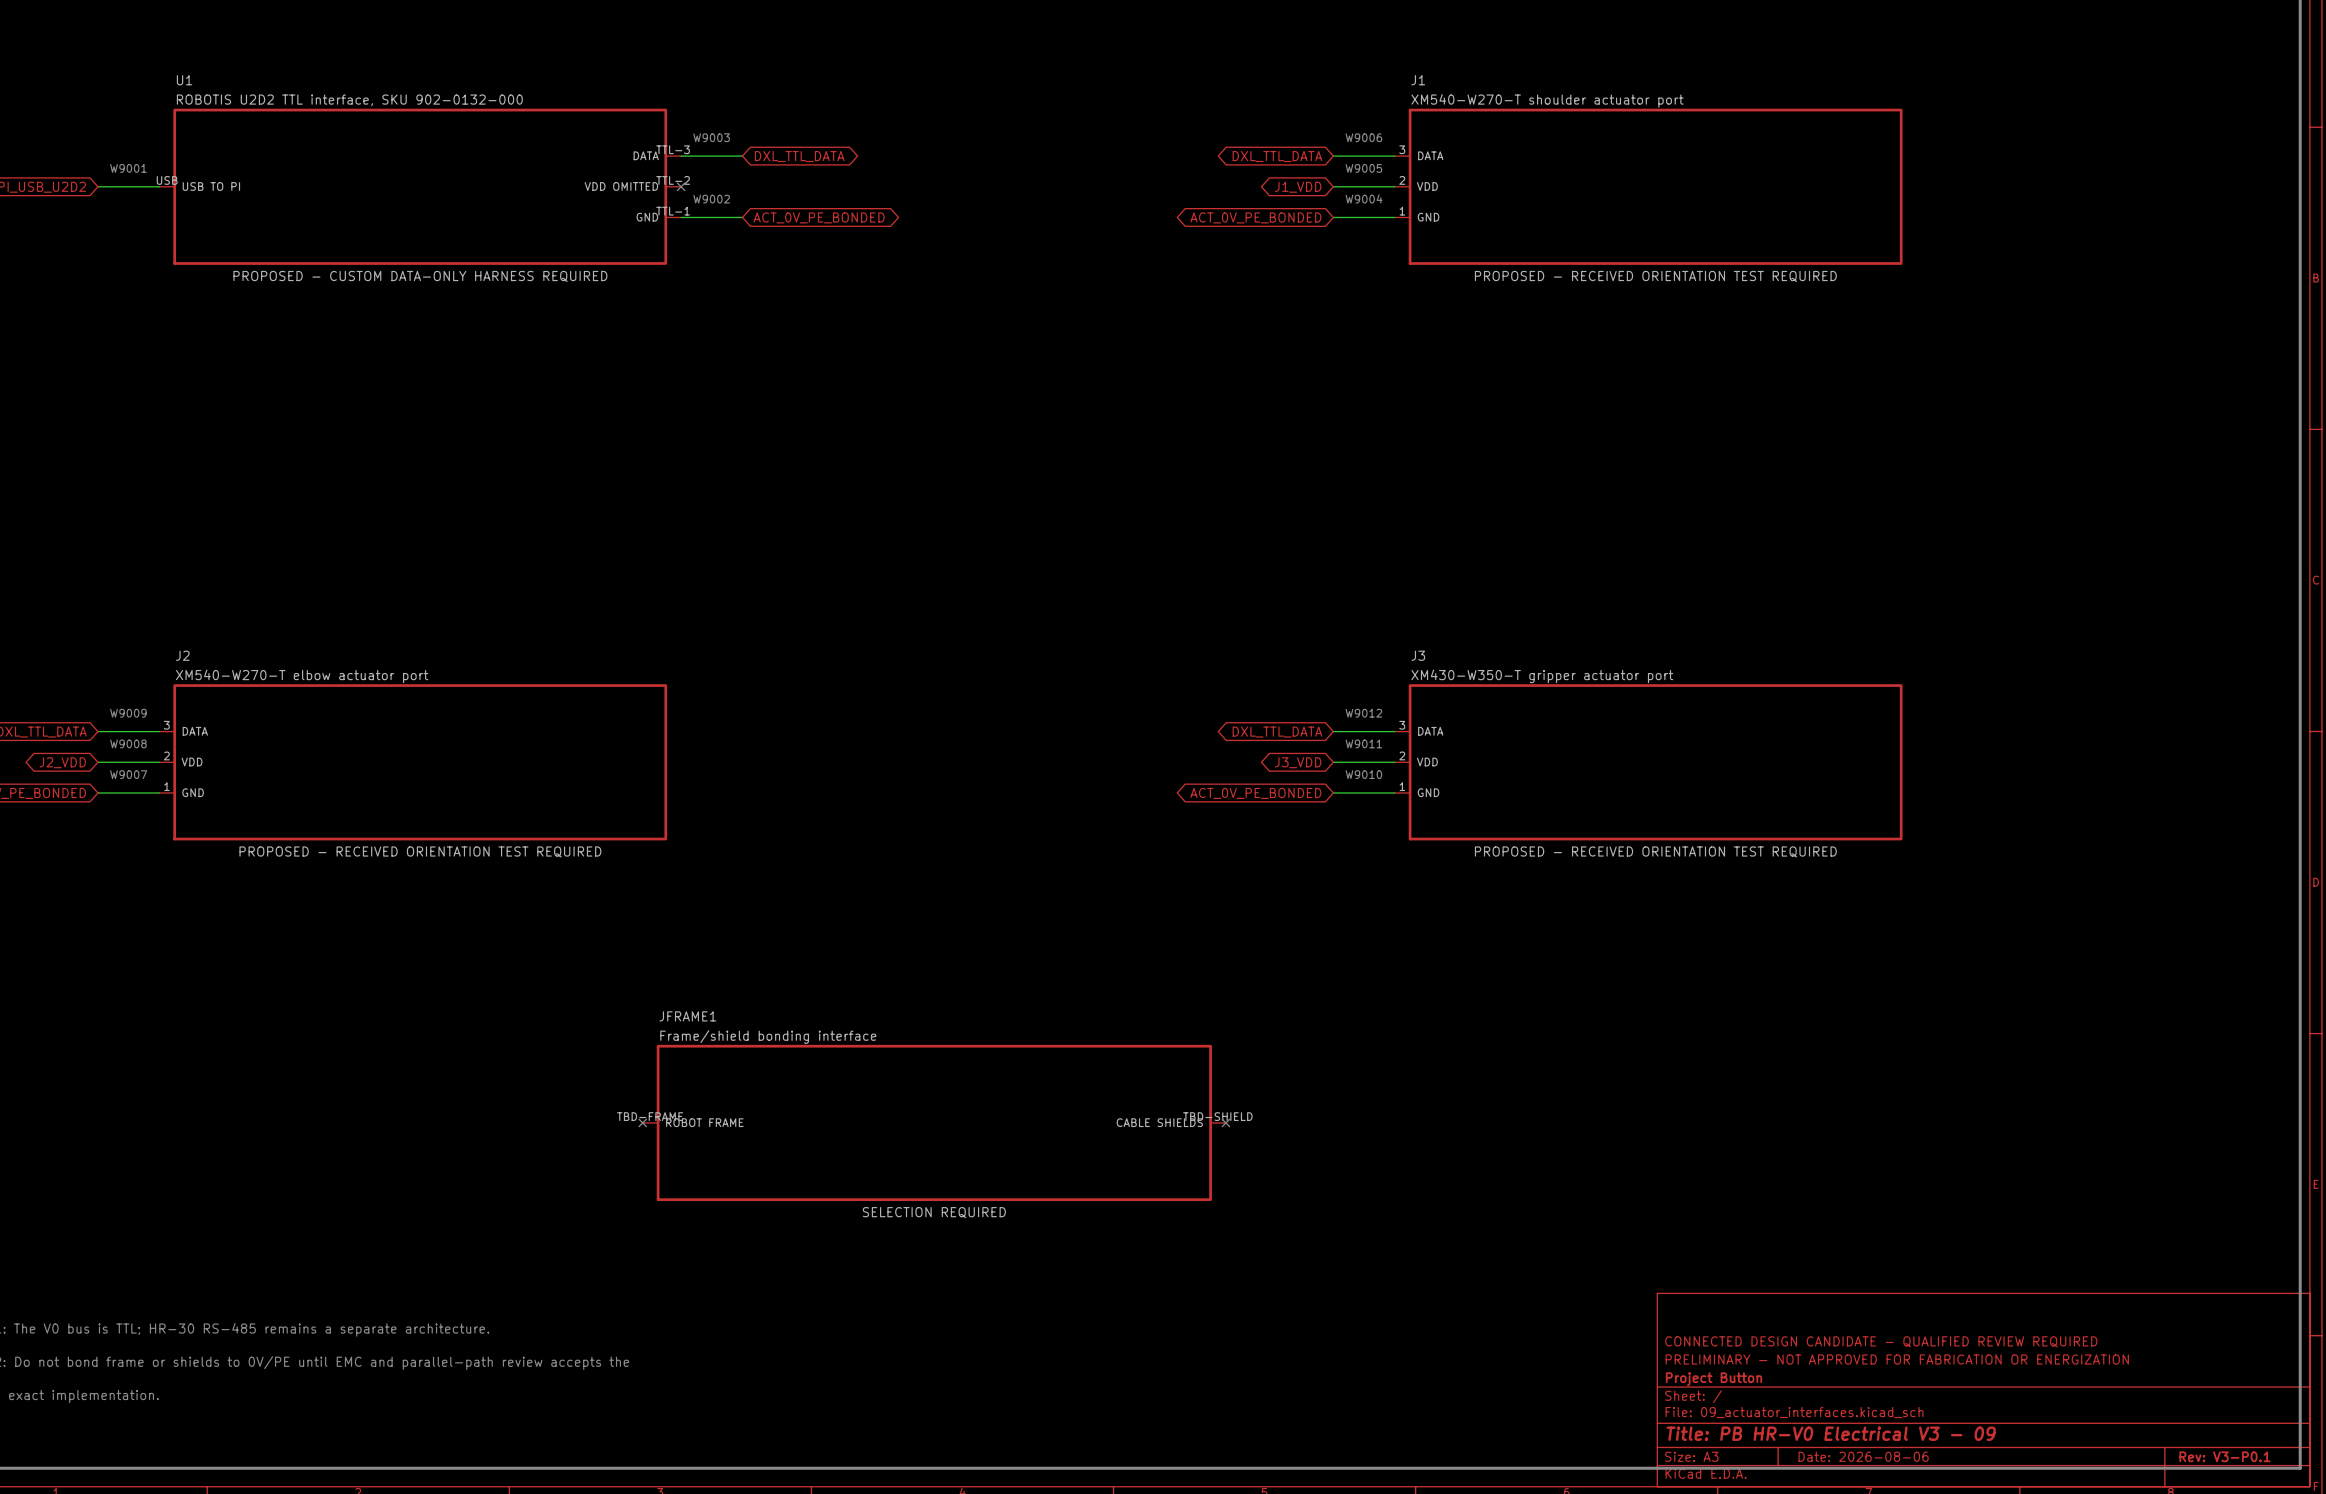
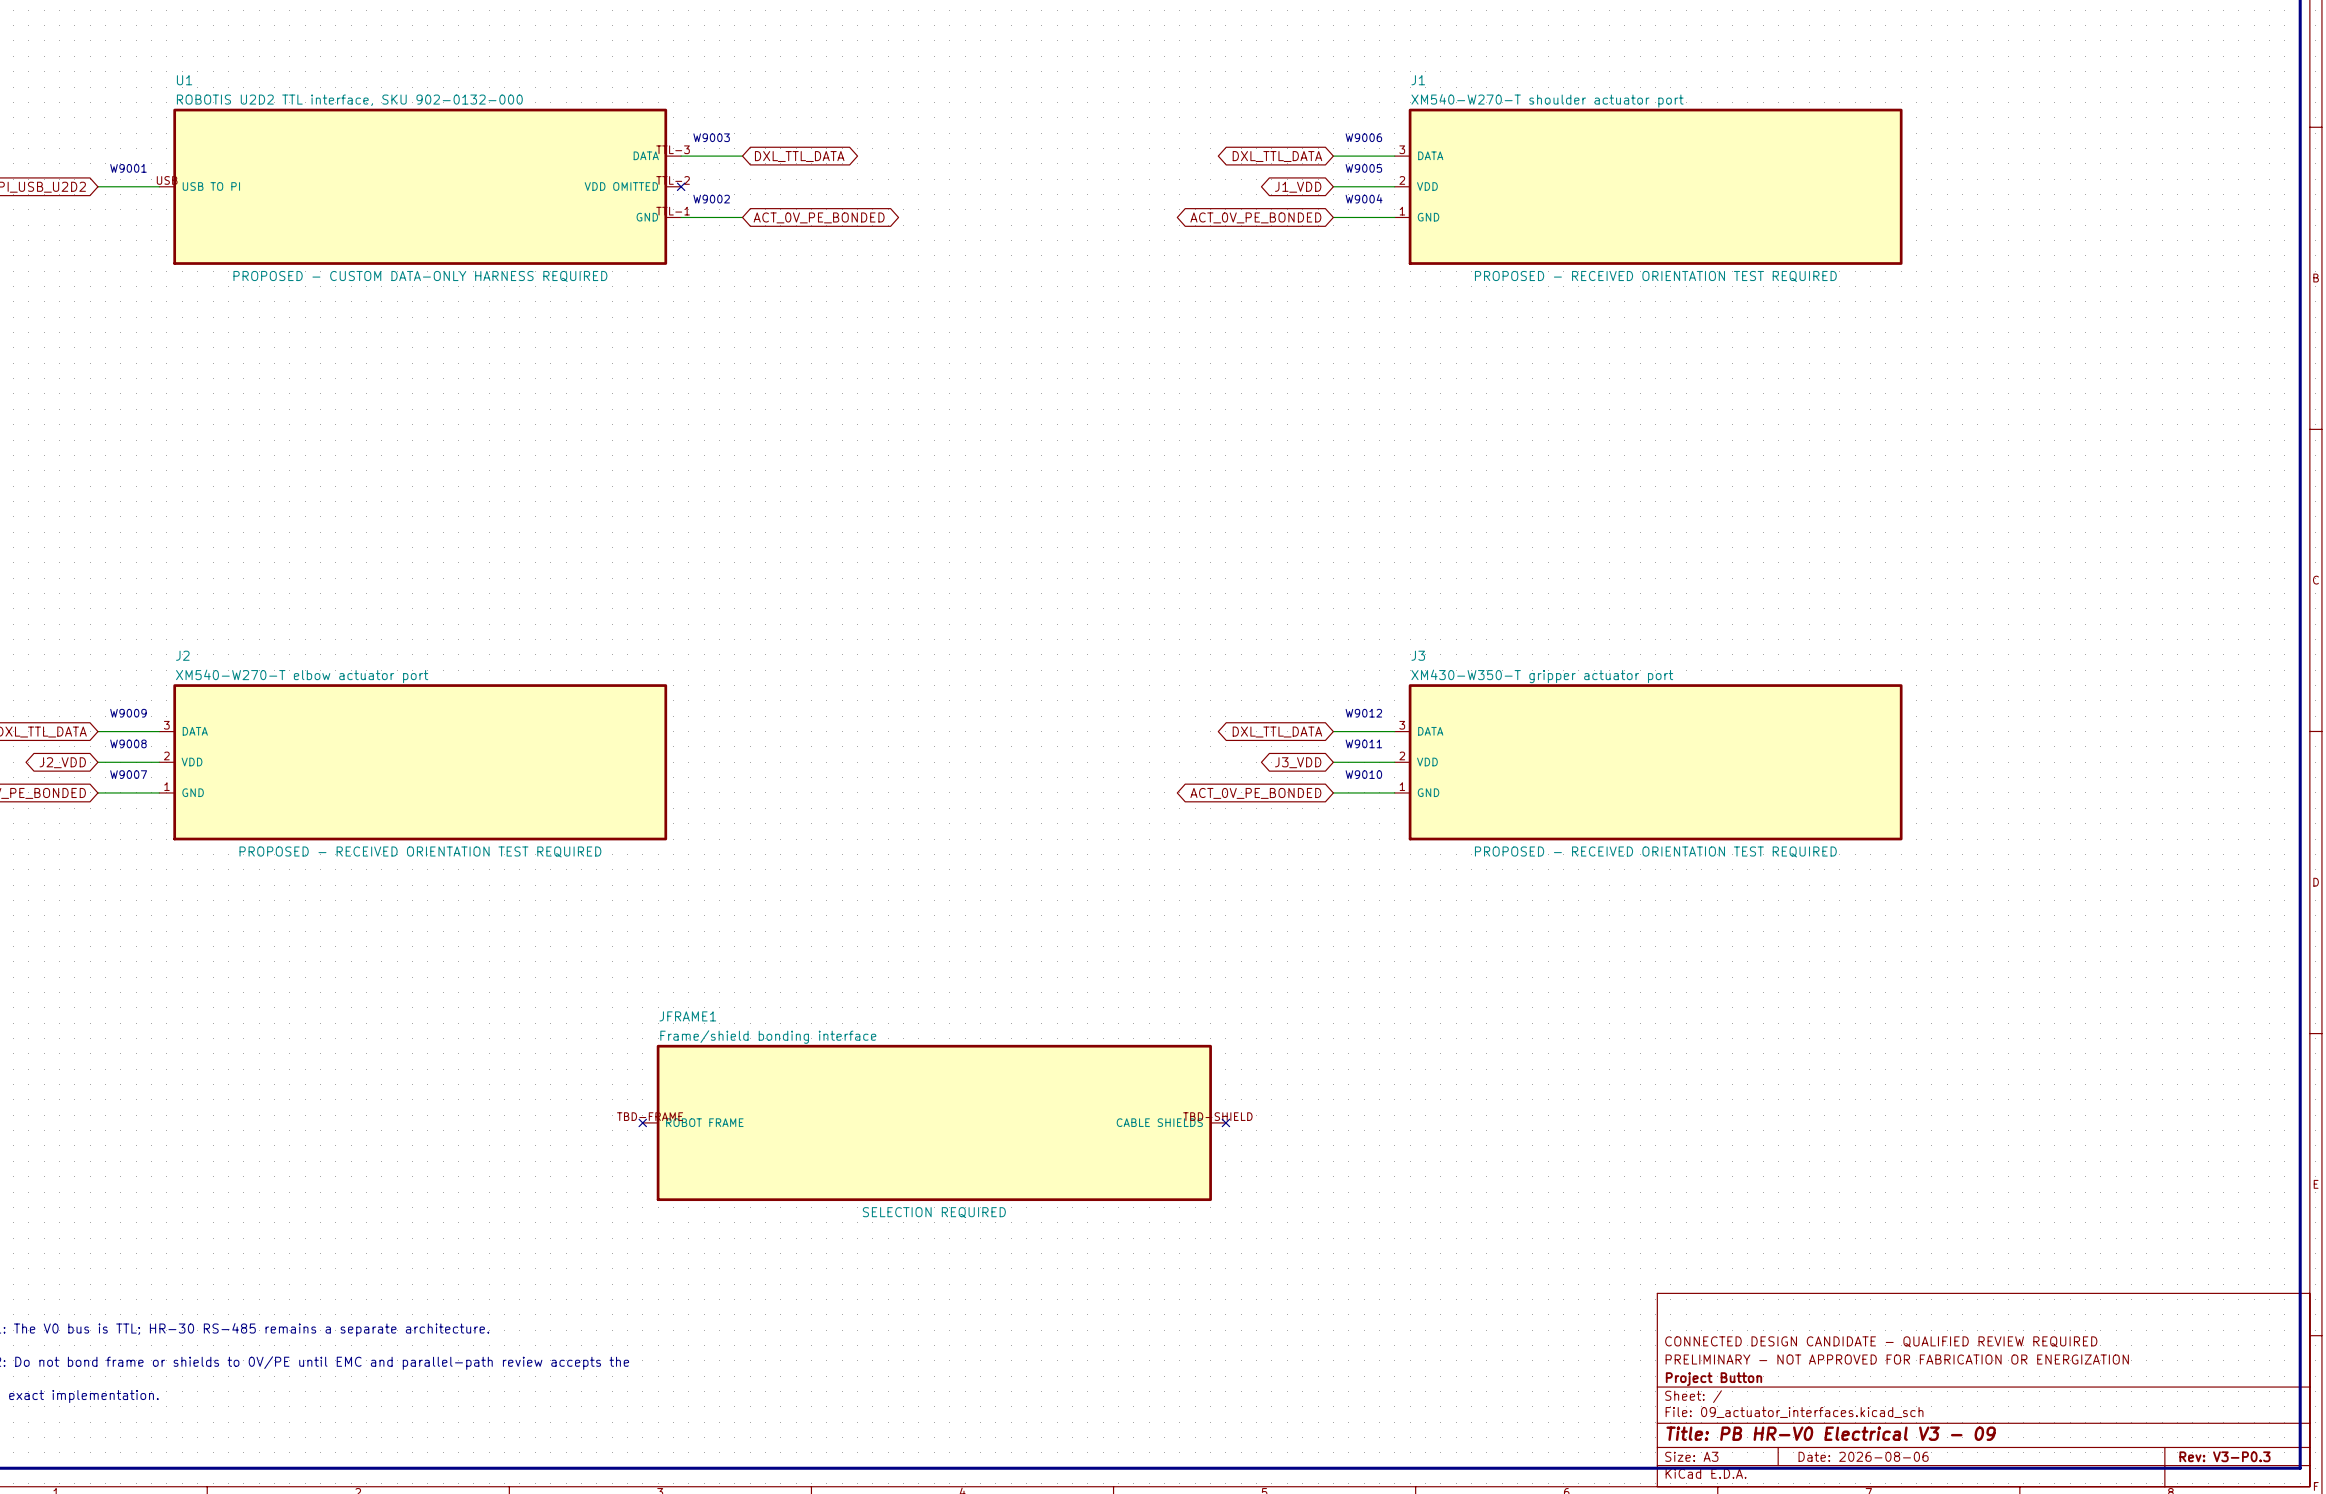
title block: Rev: V3-P0.1 (2224, 1456) -> Rev: V3-P0.3 (2224, 1456)

